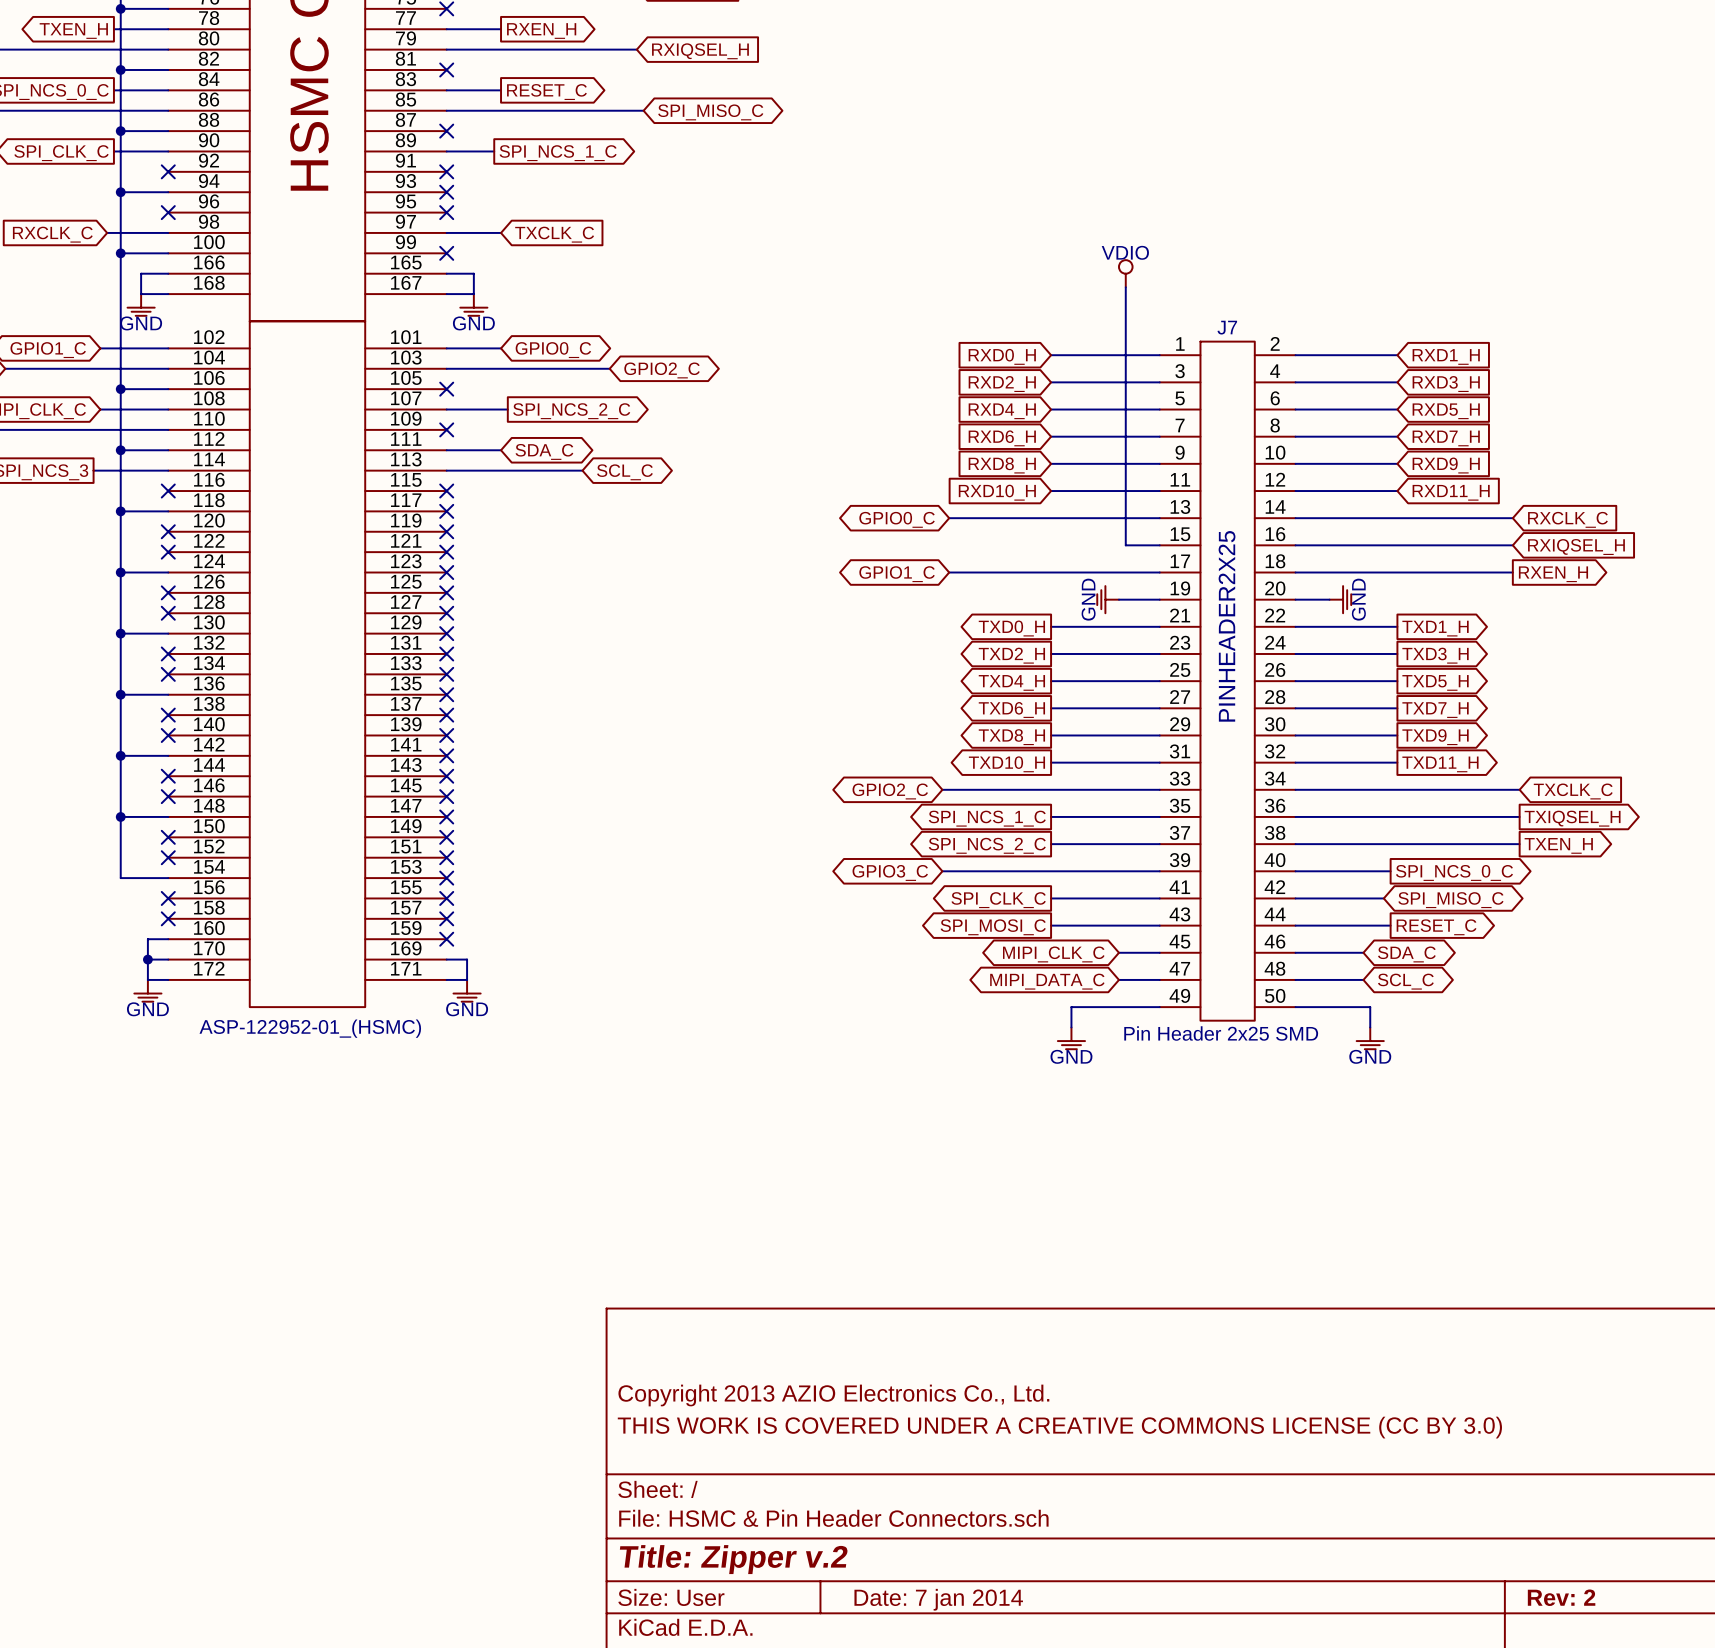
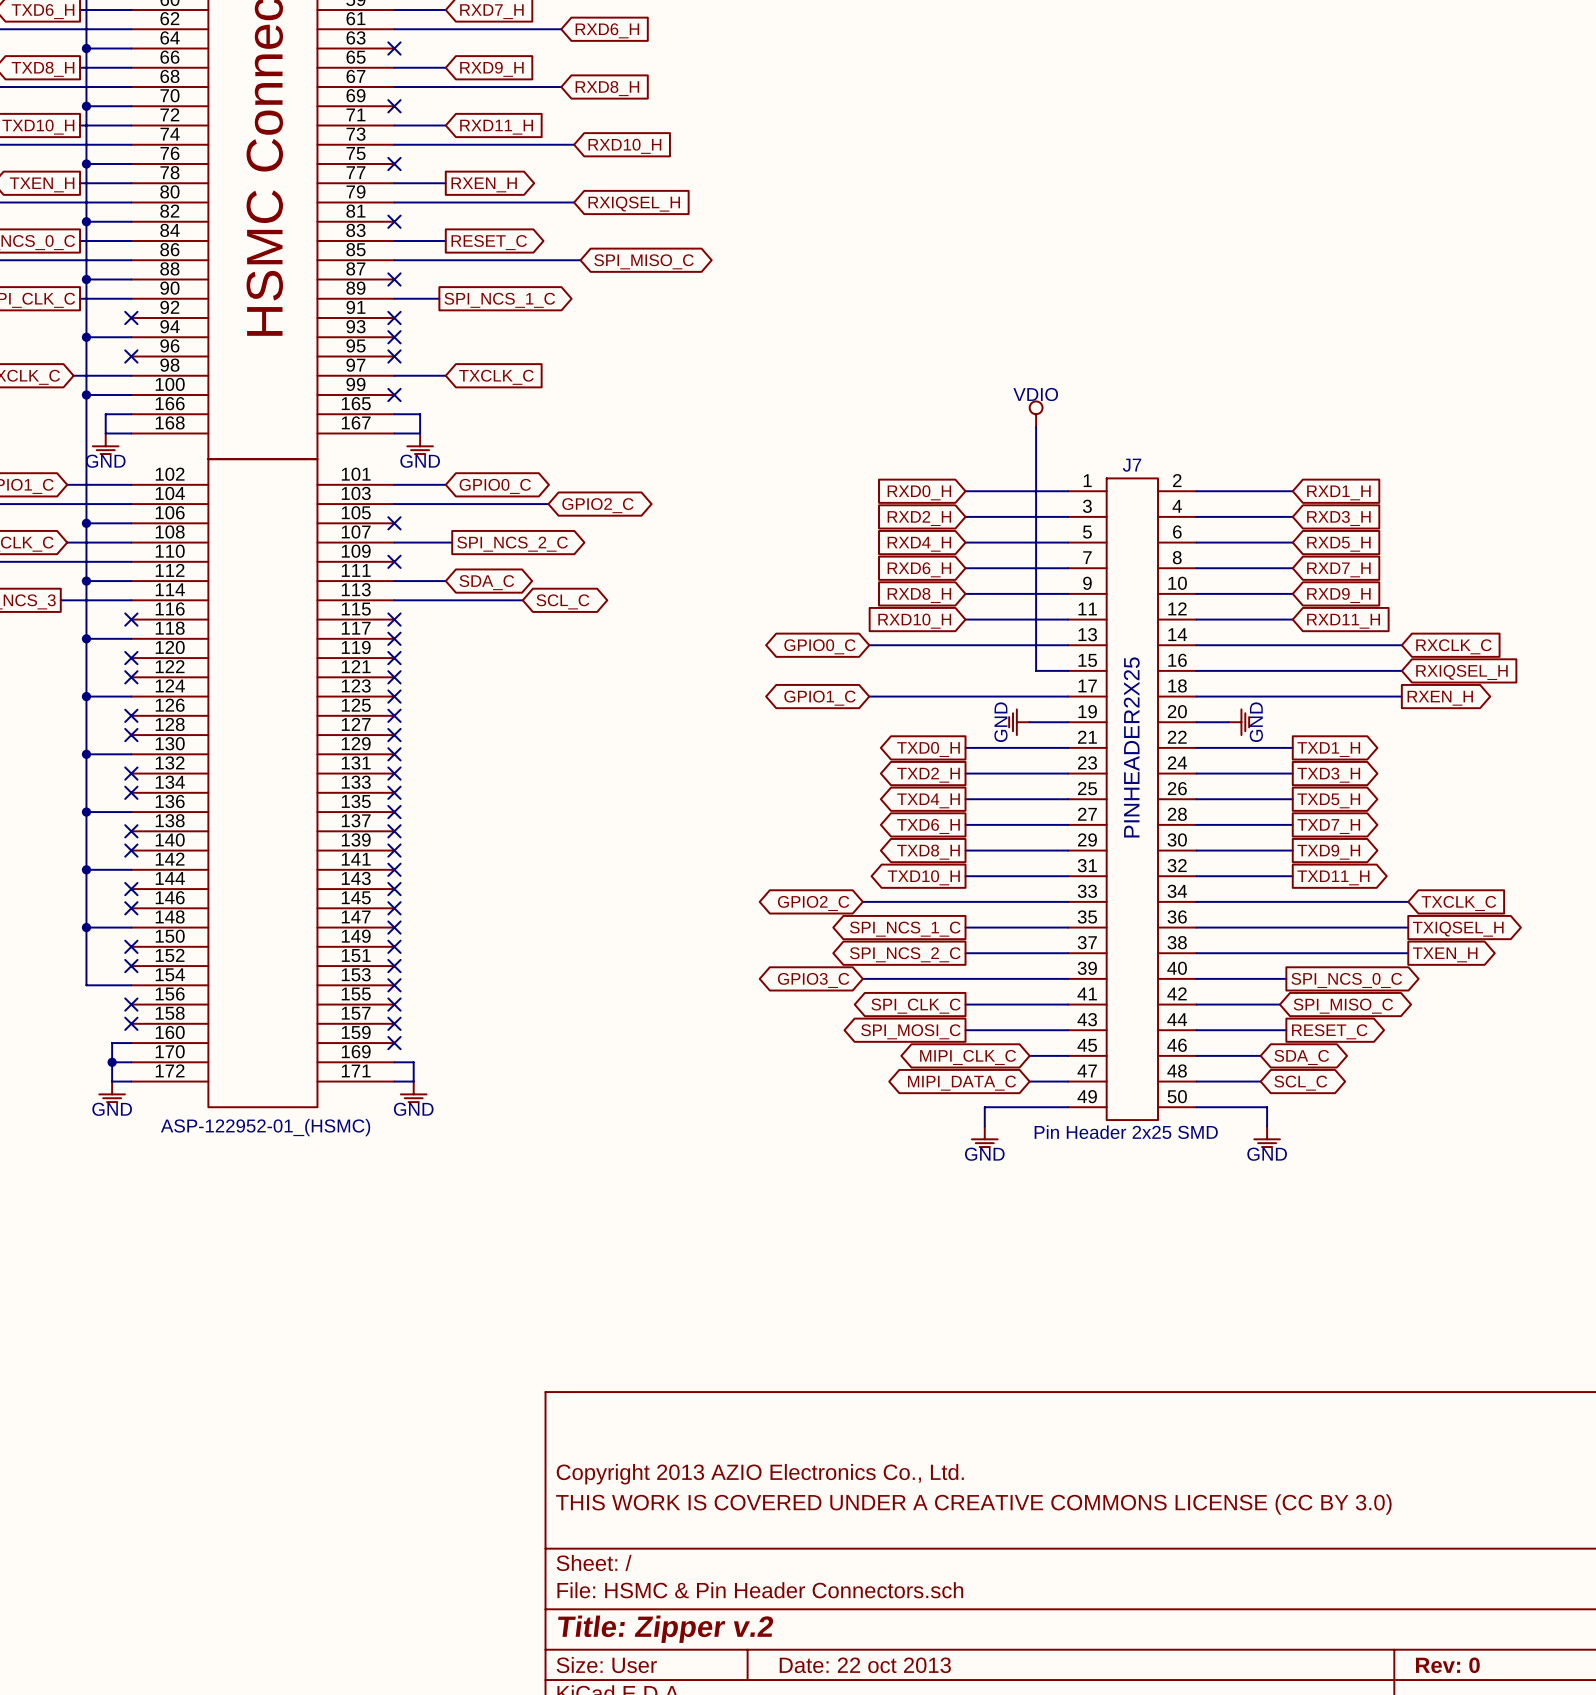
title block: Rev: 2 (1561, 1597) -> Rev: 0 (1447, 1665)
title block: Date: 7 jan 2014 (938, 1599) -> Date: 22 oct 2013 (865, 1665)

